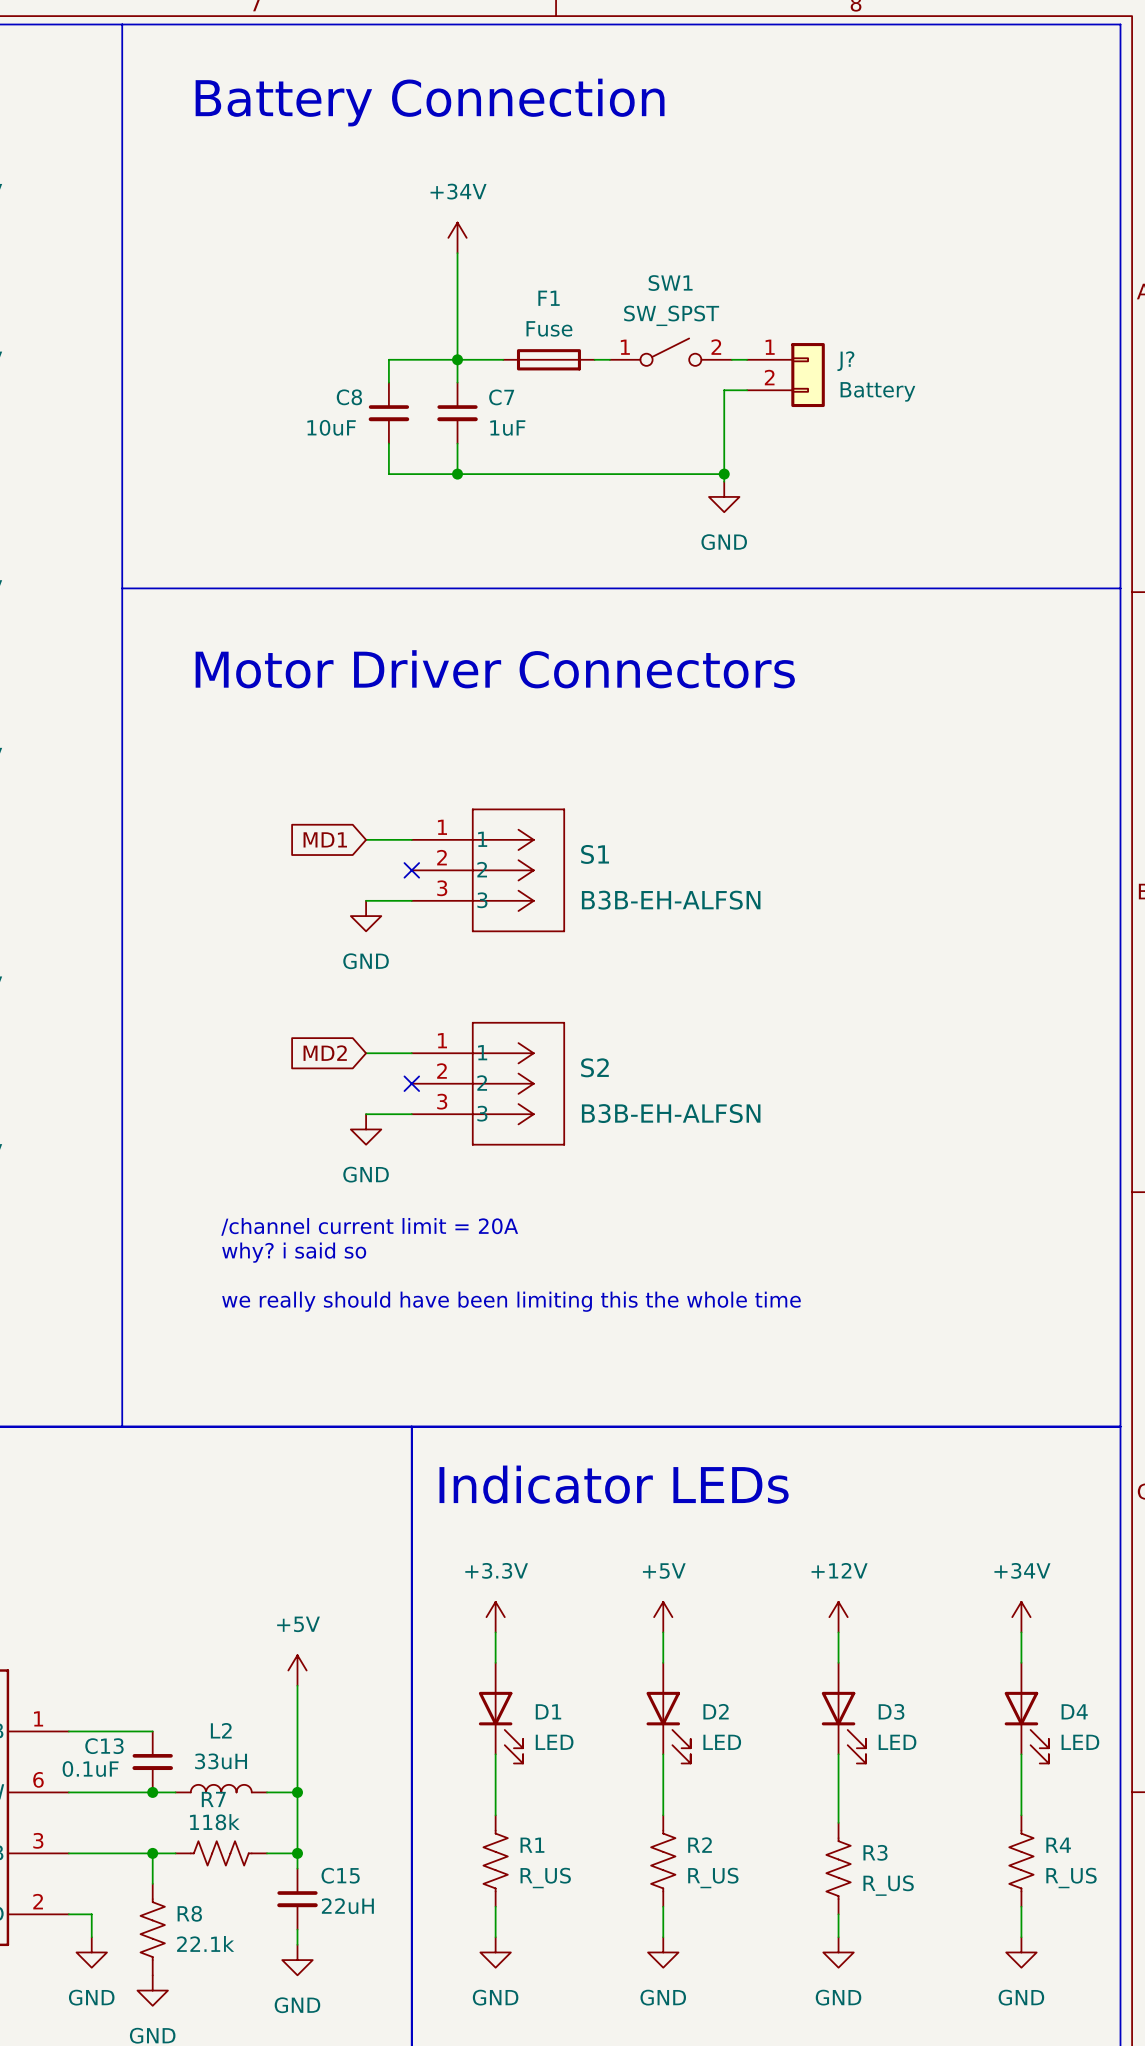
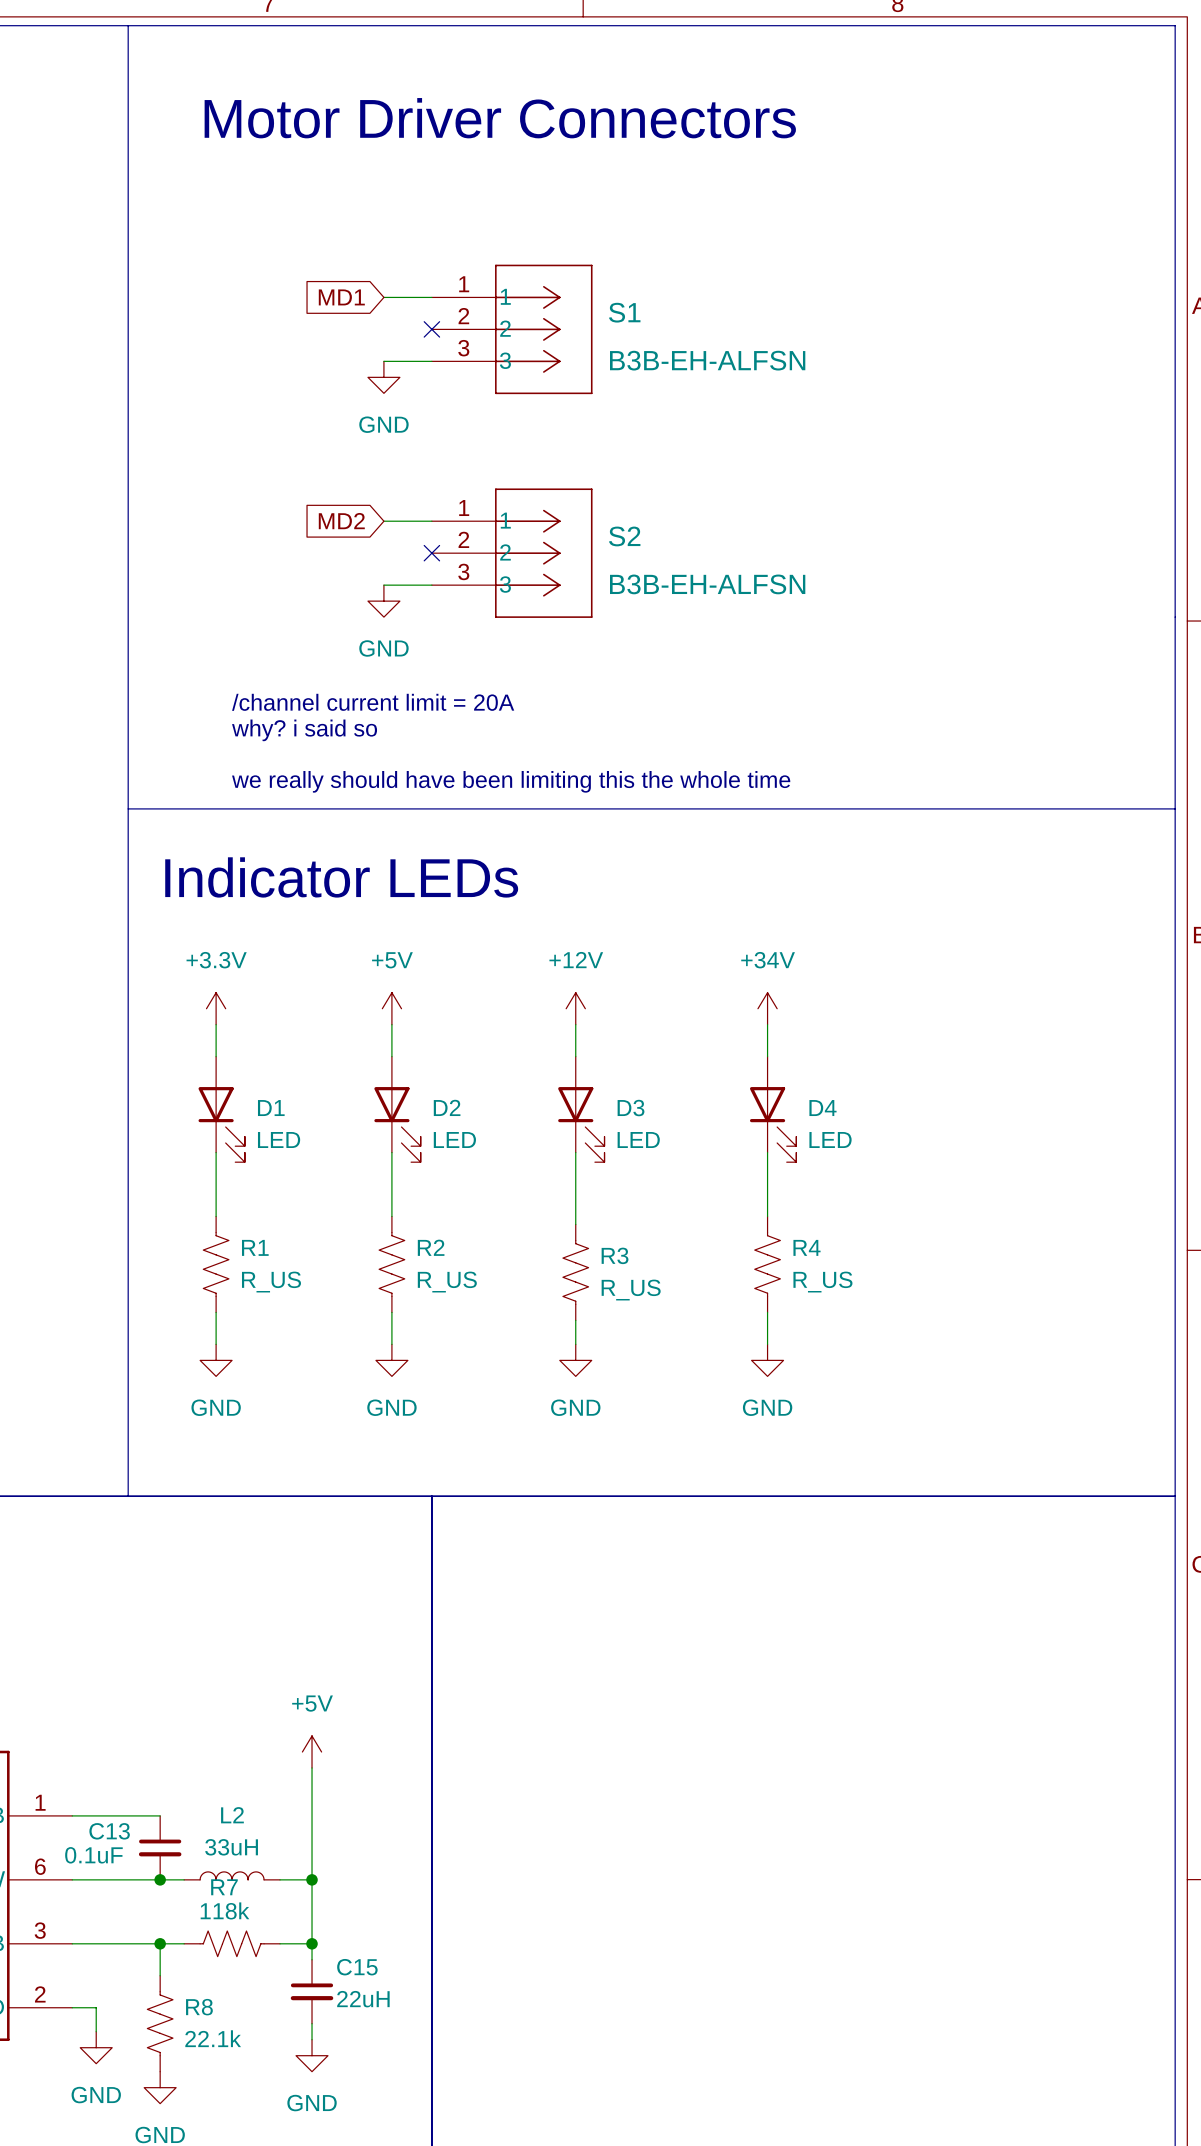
text: Battery Connection (430, 102) -> none
text: none -> Motor Driver Connectors (500, 118)
power symbol: +34V (457, 237) -> none
wire: (457, 253) (457, 382) -> none
global label: none -> MD1 (341, 297)
wire: none -> (383, 297) (431, 297)
no-connect mark: none -> (431, 329)
wire: none -> (383, 361) (431, 361)
SW1: SW_SPST (670, 352) -> none
power symbol: none -> GND (383, 377)
junction: (457, 359) -> none
wire: (503, 359) (388, 359) (388, 382) -> none
F1: Fuse (548, 359) -> none
wire: (594, 359) (609, 359) -> none
wire: (731, 359) (747, 359) -> none
J?: Battery (785, 375) -> none
wire: (747, 390) (724, 390) (724, 481) -> none
C8: 10uF (388, 413) -> none
C7: 1uF (457, 413) -> none
wire: (388, 443) (388, 474) (724, 474) -> none
wire: (457, 443) (457, 474) -> none
junction: (457, 474) -> none
junction: (724, 474) -> none
global label: none -> MD2 (341, 521)
wire: none -> (383, 521) (431, 521)
power symbol: GND (724, 496) -> none
no-connect mark: none -> (431, 553)
power symbol: none -> GND (383, 601)
line: (122, 588) (1120, 588) -> (128, 808) (1175, 808)
text: Motor Driver Connectors (495, 669) -> none
text: none -> /channel current limit = 20A (373, 702)
text: none -> why? i said so (304, 730)
text: none -> we really should have been limiting this the whole time (511, 781)
text: none -> Indicator LEDs (341, 877)
global label: MD1 (325, 839) -> none
wire: (366, 839) (411, 839) -> (383, 585) (431, 585)
no-connect mark: (411, 870) -> none
S1 position: (488, 870) -> (512, 329)
wire: (366, 900) (411, 900) -> none
power symbol: GND (366, 916) -> none
power symbol: none -> +3.3V (216, 1008)
power symbol: none -> +5V (391, 1008)
power symbol: none -> +12V (575, 1008)
power symbol: none -> +34V (767, 1008)
wire: none -> (216, 1024) (216, 1056)
wire: none -> (391, 1024) (391, 1056)
wire: none -> (575, 1024) (575, 1056)
wire: none -> (767, 1024) (767, 1056)
global label: MD2 (325, 1053) -> none
wire: (366, 1053) (411, 1053) -> none
no-connect mark: (411, 1083) -> none
S2 position: (488, 1083) -> (512, 553)
wire: none -> (216, 1152) (216, 1216)
wire: none -> (391, 1152) (391, 1216)
wire: none -> (575, 1152) (575, 1224)
wire: none -> (767, 1152) (767, 1216)
wire: (366, 1114) (411, 1114) -> none
power symbol: GND (366, 1129) -> none
text: /channel current limit = 20A (369, 1226) -> none
wire: none -> (216, 1312) (216, 1344)
wire: none -> (391, 1312) (391, 1344)
wire: none -> (767, 1312) (767, 1344)
text: why? i said so (294, 1252) -> none
wire: none -> (575, 1320) (575, 1344)
power symbol: none -> GND (216, 1360)
power symbol: none -> GND (391, 1360)
power symbol: none -> GND (575, 1360)
power symbol: none -> GND (767, 1360)
text: we really should have been limiting this the whole time (511, 1301) -> none
text: Indicator LEDs (614, 1484) -> none
power symbol: +3.3V (495, 1617) -> none
power symbol: +5V (663, 1617) -> none
power symbol: +12V (838, 1617) -> none
power symbol: +34V (1021, 1617) -> none
wire: (495, 1632) (495, 1662) -> none
wire: (663, 1632) (663, 1662) -> none
wire: (838, 1632) (838, 1662) -> none
wire: (1021, 1632) (1021, 1662) -> none
D1 position: (500, 1713) -> (221, 1109)
D2 position: (668, 1713) -> (397, 1109)
D3 position: (843, 1713) -> (581, 1109)
D4 position: (1026, 1713) -> (773, 1109)
wire: (495, 1754) (495, 1815) -> none
wire: (663, 1754) (663, 1815) -> none
wire: (838, 1754) (838, 1822) -> none
wire: (1021, 1754) (1021, 1815) -> none
R1 position: (495, 1861) -> (216, 1264)
R2 position: (663, 1861) -> (391, 1264)
R4 position: (1021, 1861) -> (767, 1264)
R3 position: (838, 1868) -> (575, 1272)
wire: (495, 1906) (495, 1937) -> none
wire: (663, 1906) (663, 1937) -> none
wire: (1021, 1906) (1021, 1937) -> none
wire: (838, 1914) (838, 1937) -> none
power symbol: GND (495, 1952) -> none
power symbol: GND (663, 1952) -> none
power symbol: GND (838, 1952) -> none
power symbol: GND (1021, 1952) -> none

